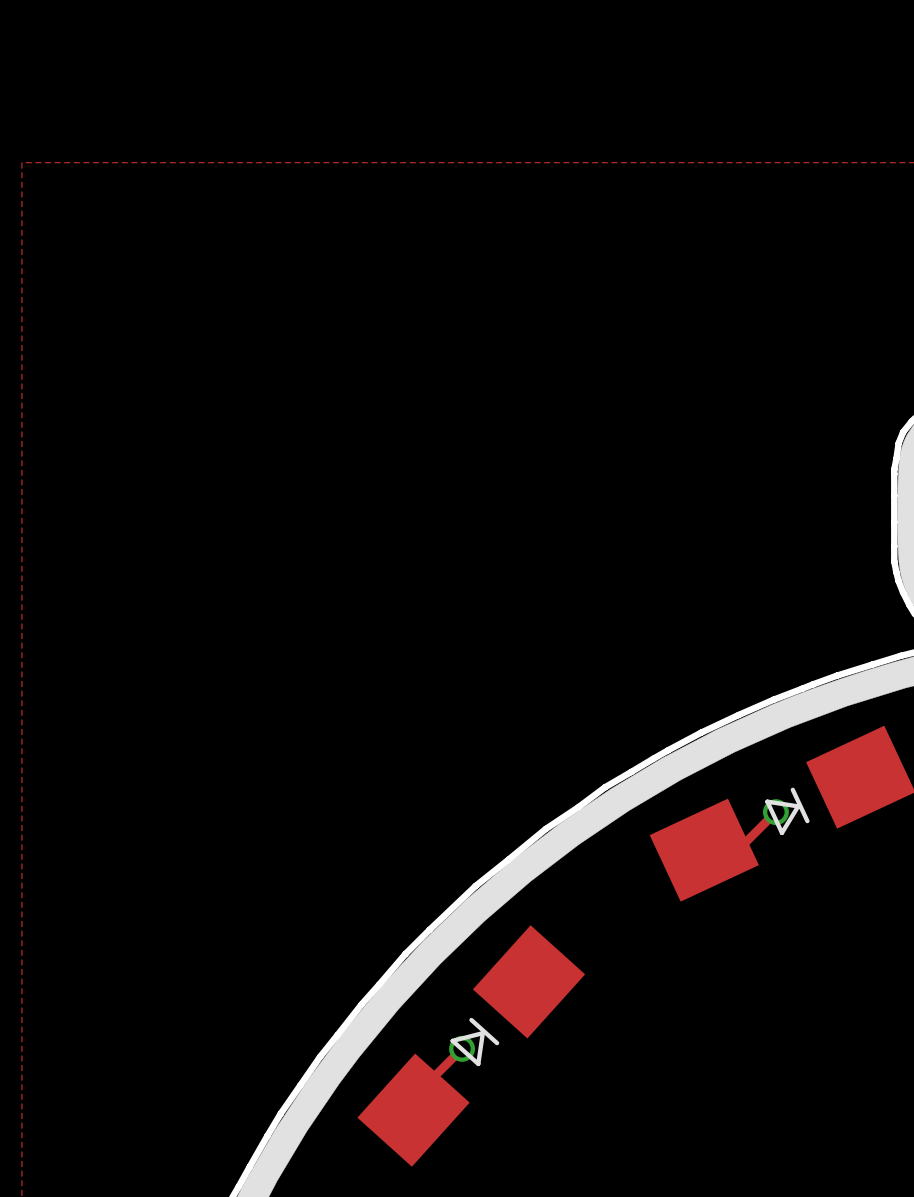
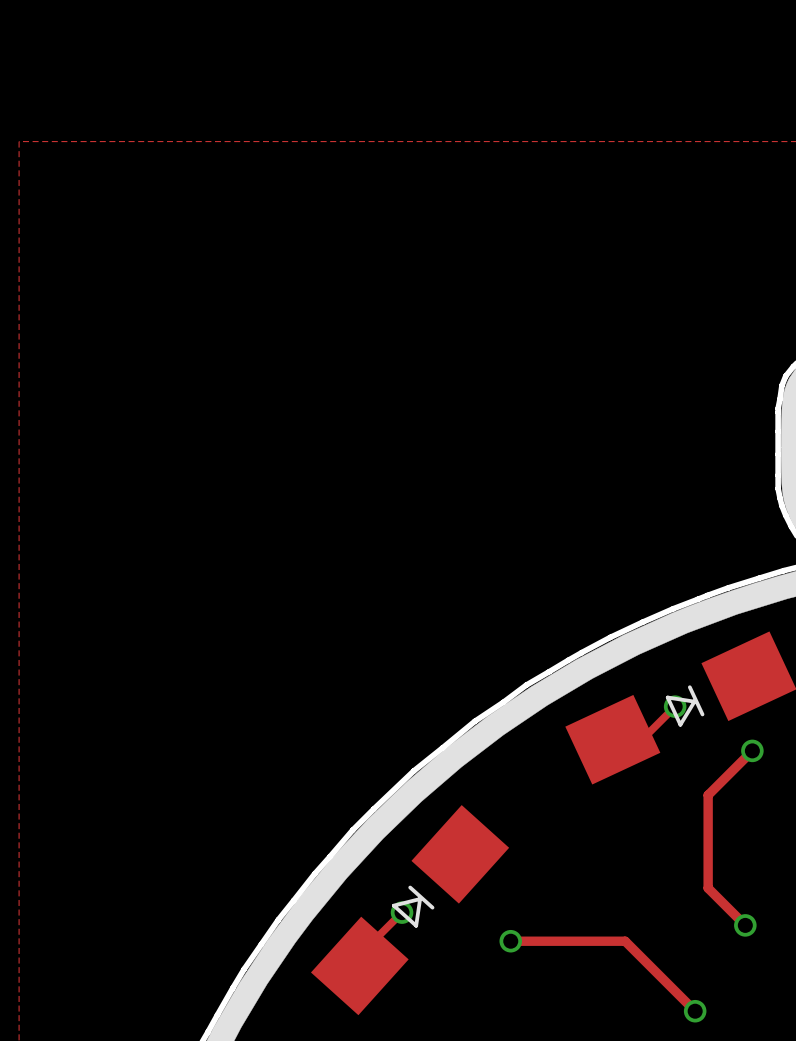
track: none -> (752, 750) (708, 795) (708, 888) (745, 925)
via: none -> (752, 750)
via: none -> (745, 925)
track: none -> (510, 941) (625, 941) (695, 1011)
via: none -> (510, 941)
via: none -> (695, 1011)

